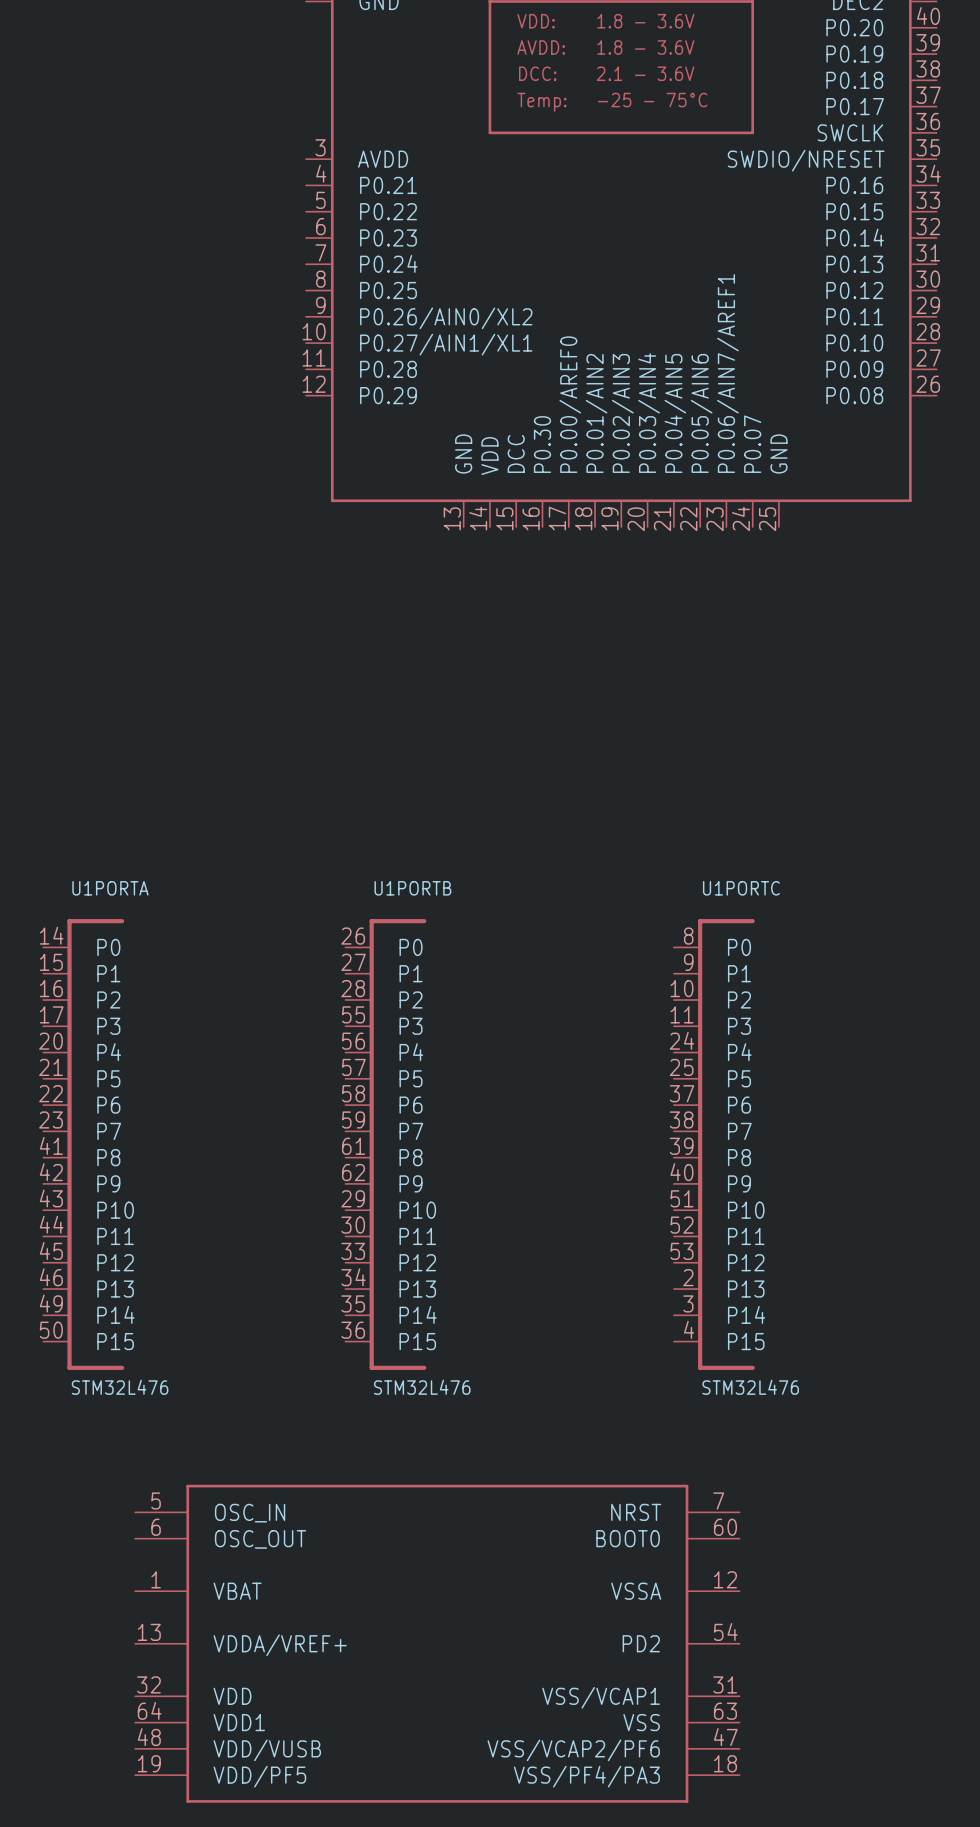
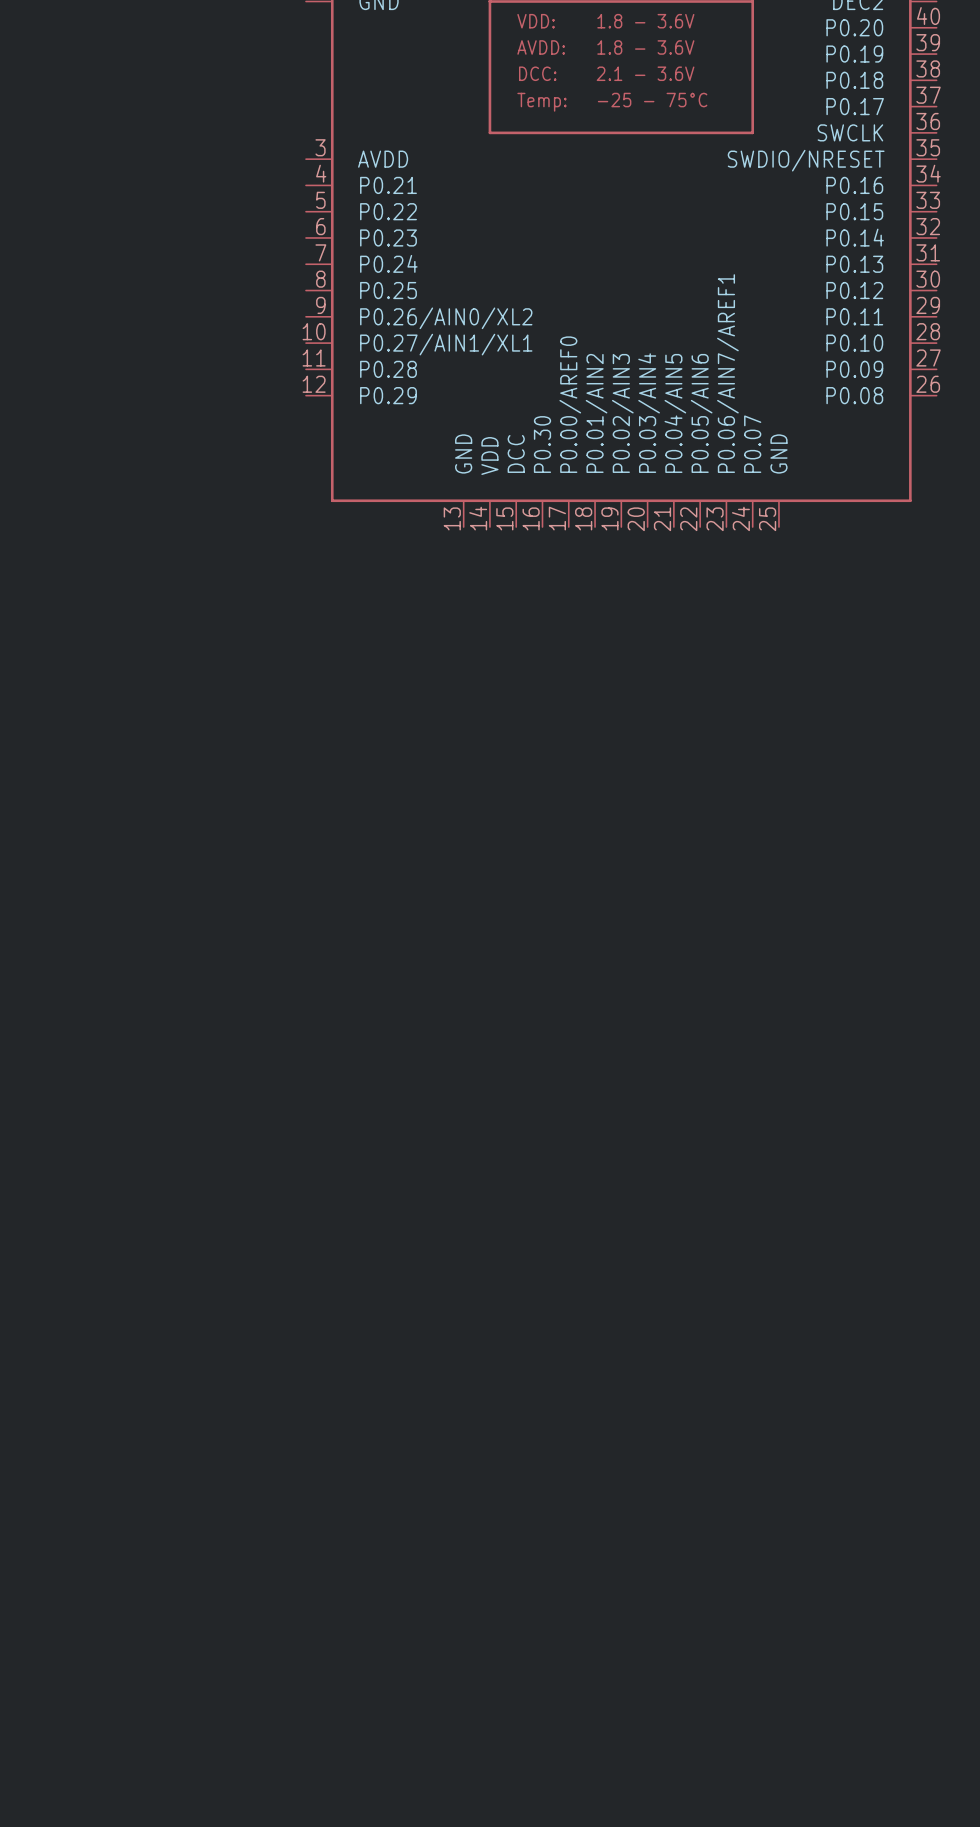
U1PORTA: STM32L476 (83, 1144) -> none
U1PORTB: STM32L476 (385, 1144) -> none
U1PORTC: STM32L476 (714, 1144) -> none
part: (437, 1643) -> none

